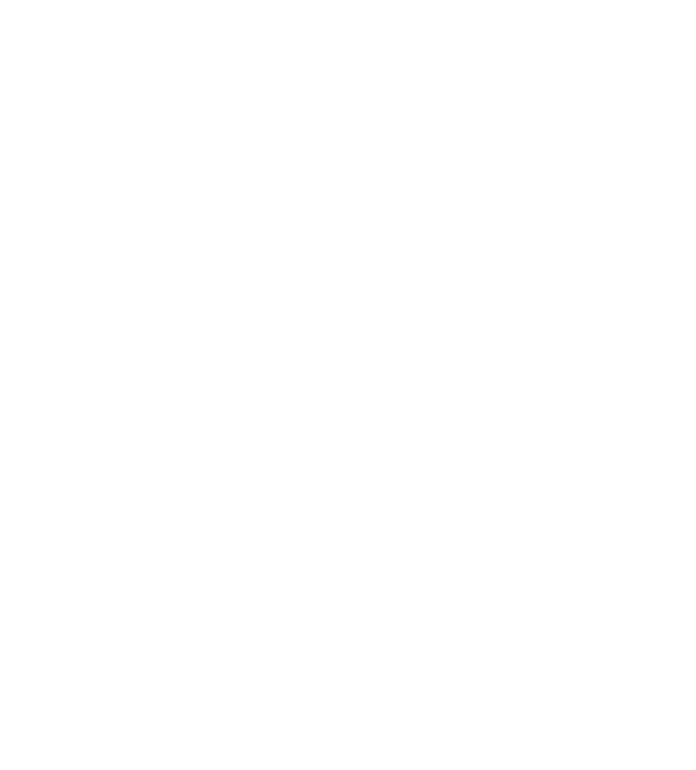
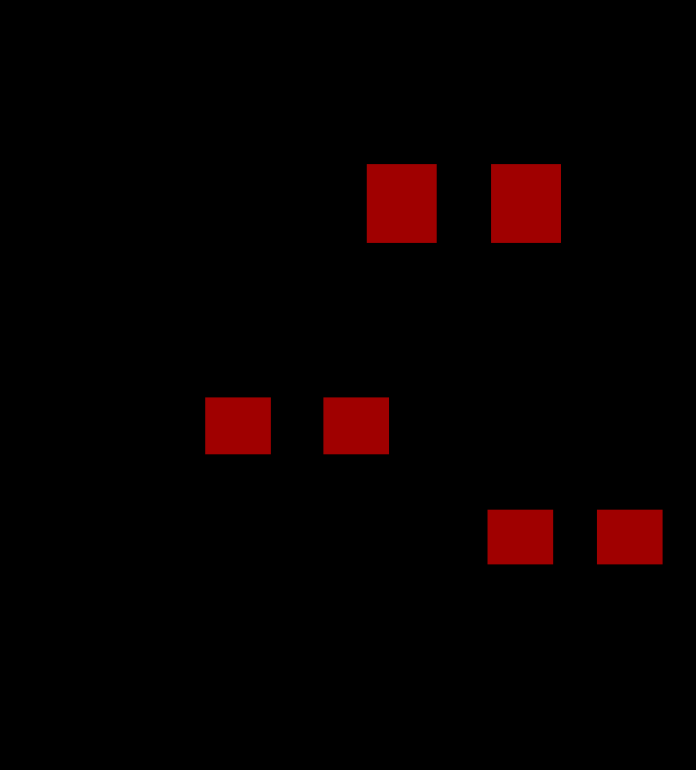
part: none -> (463, 203)
part: none -> (297, 425)
part: none -> (575, 537)

